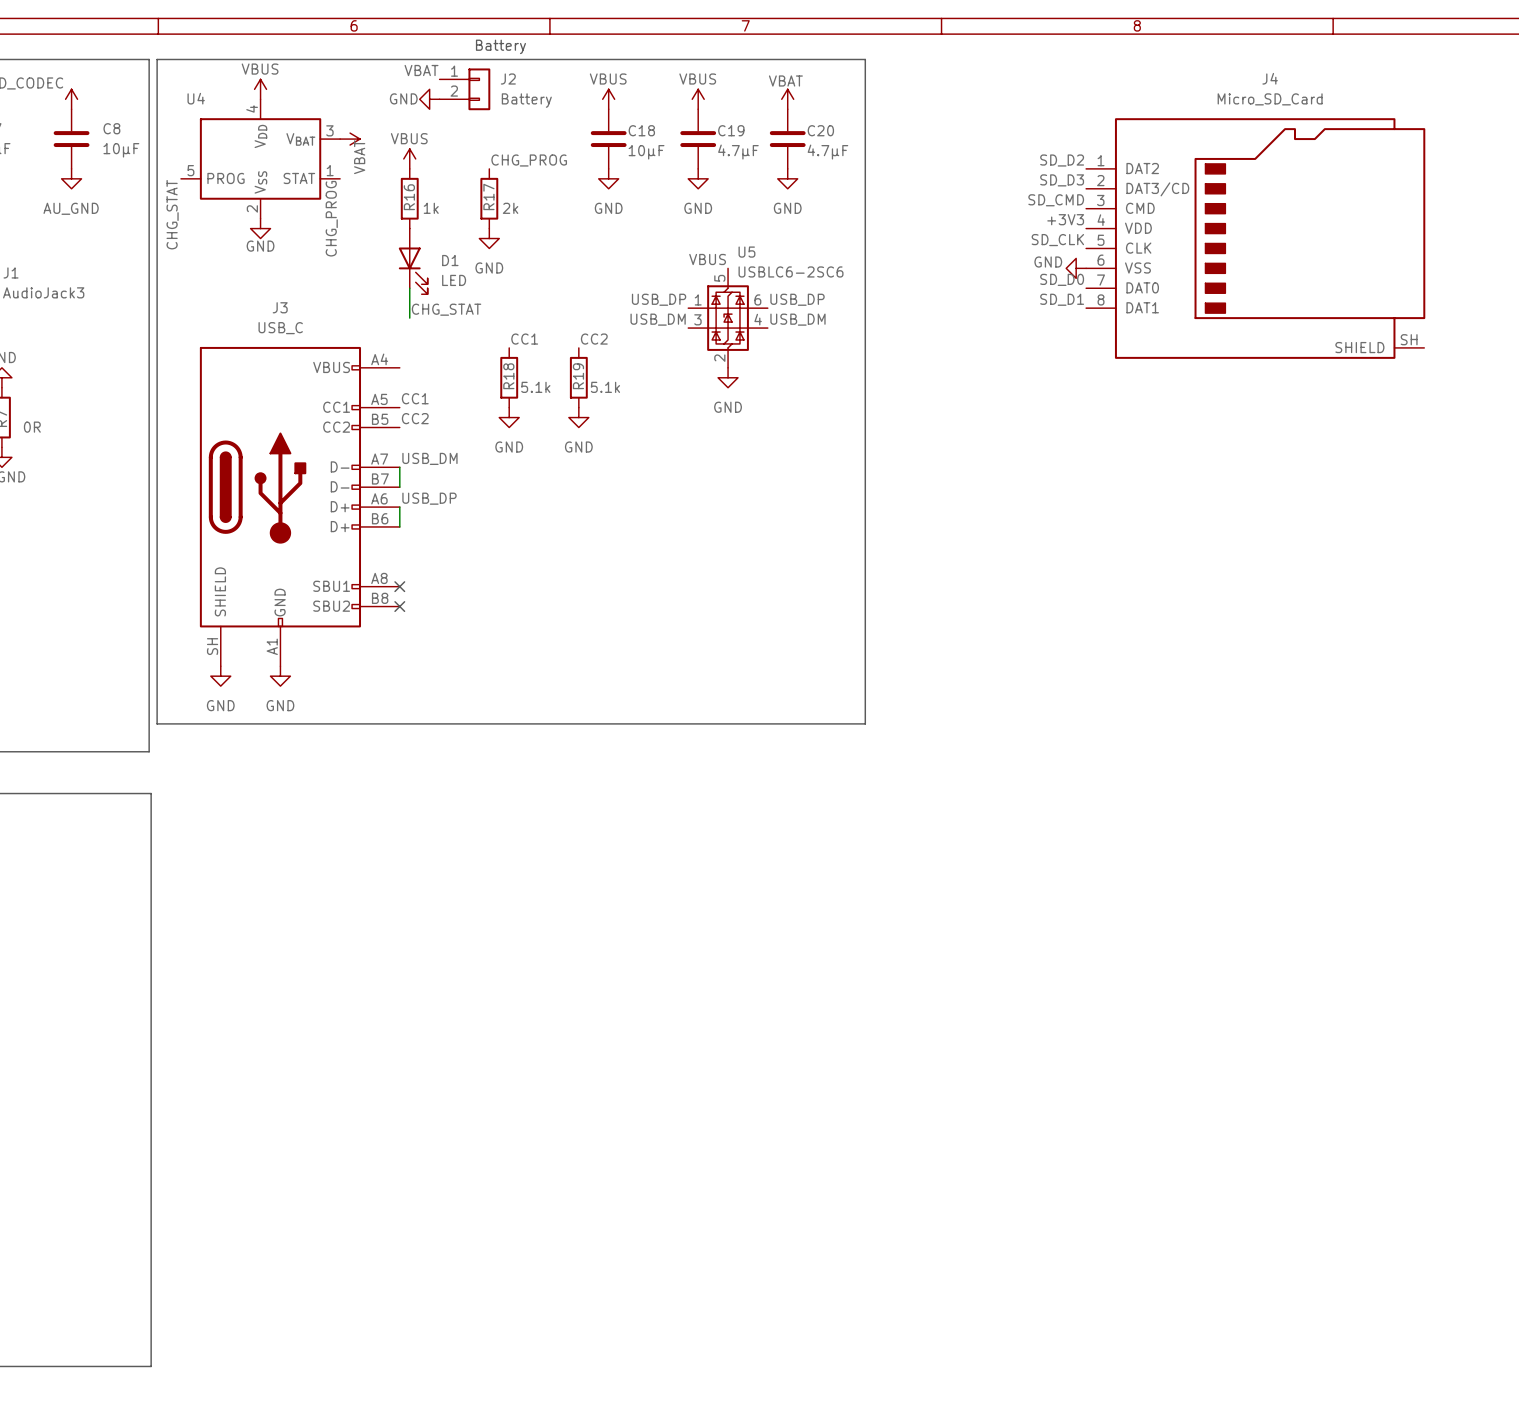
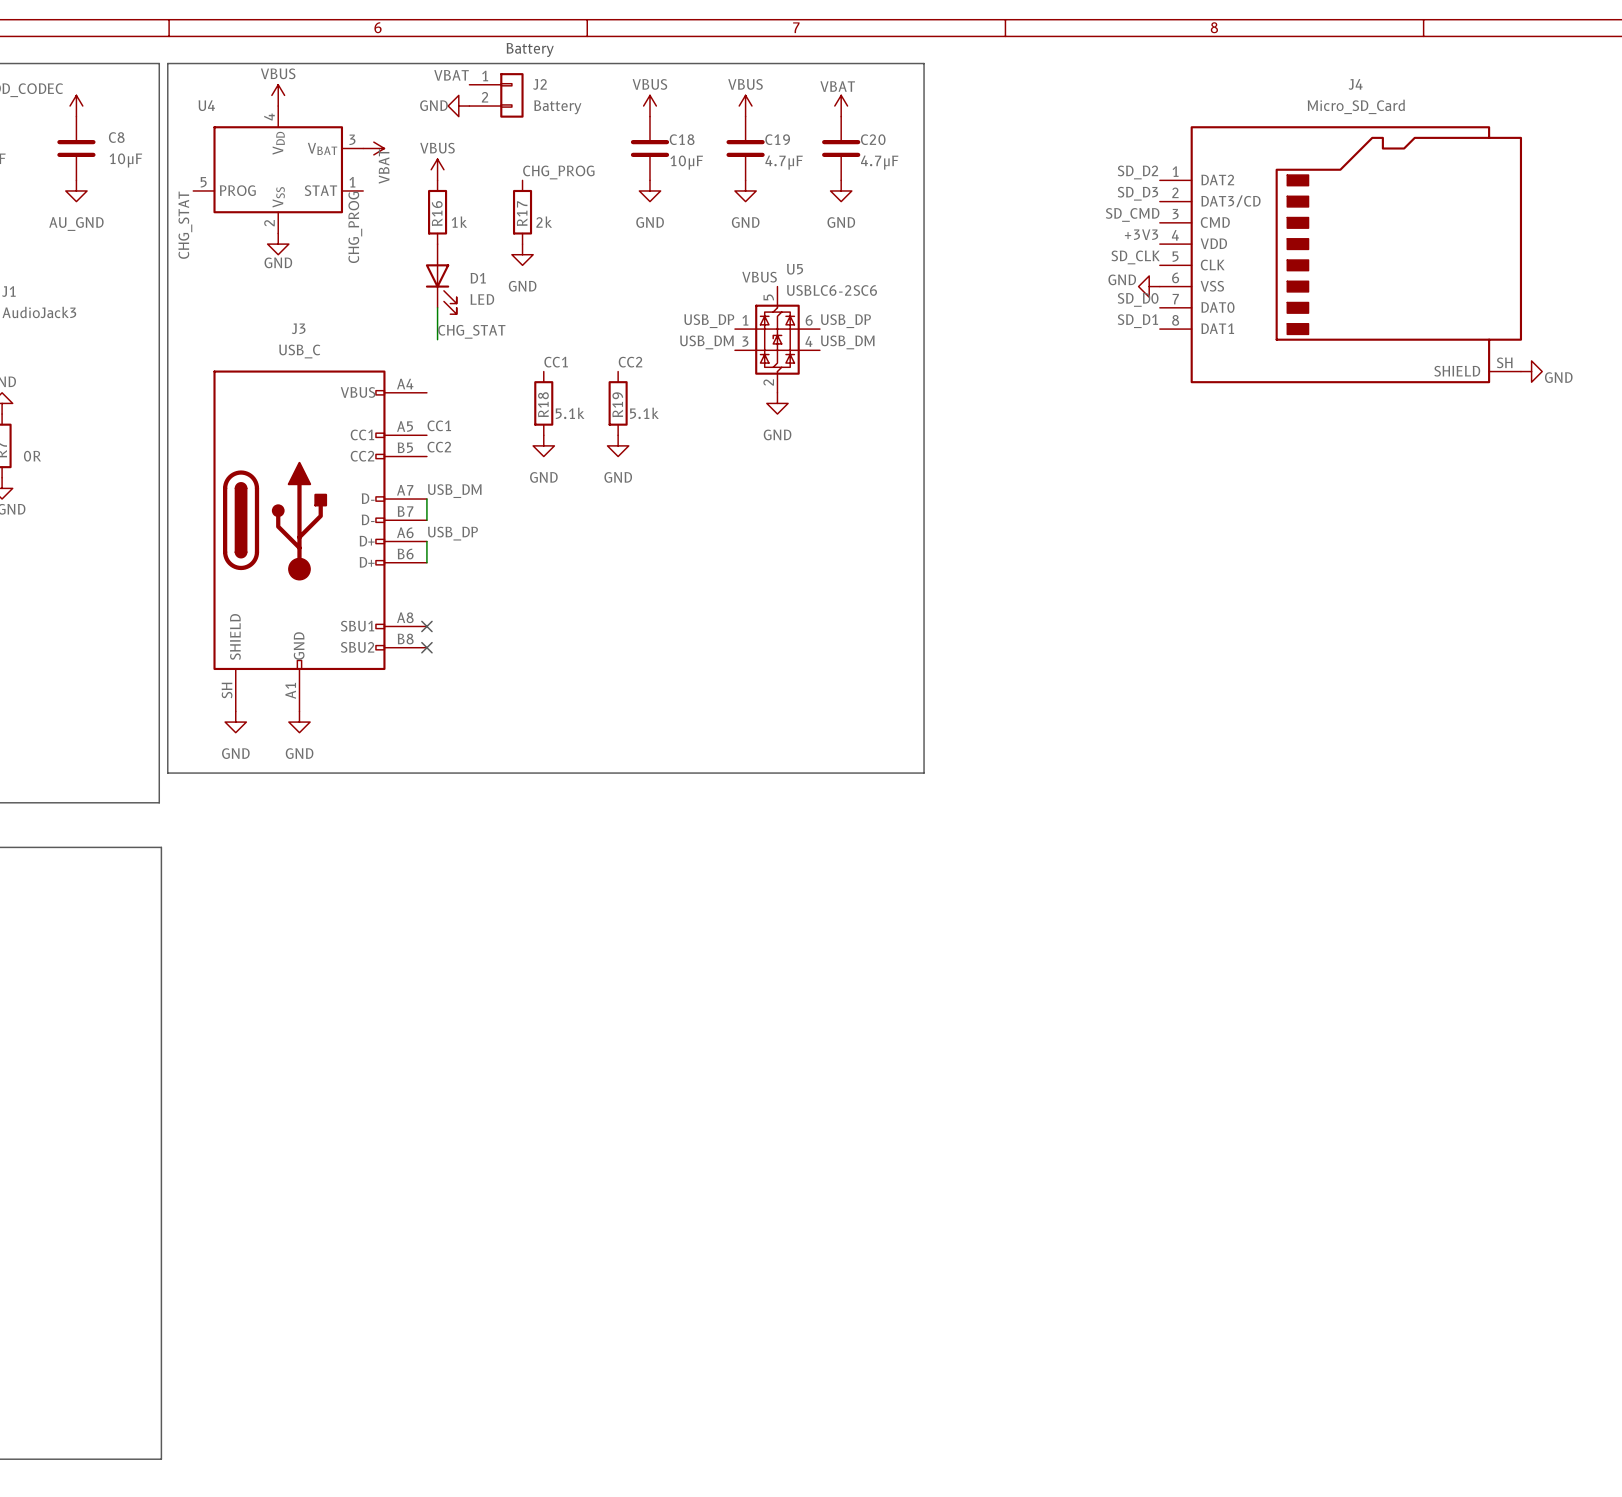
power symbol: none -> GND (1531, 371)

